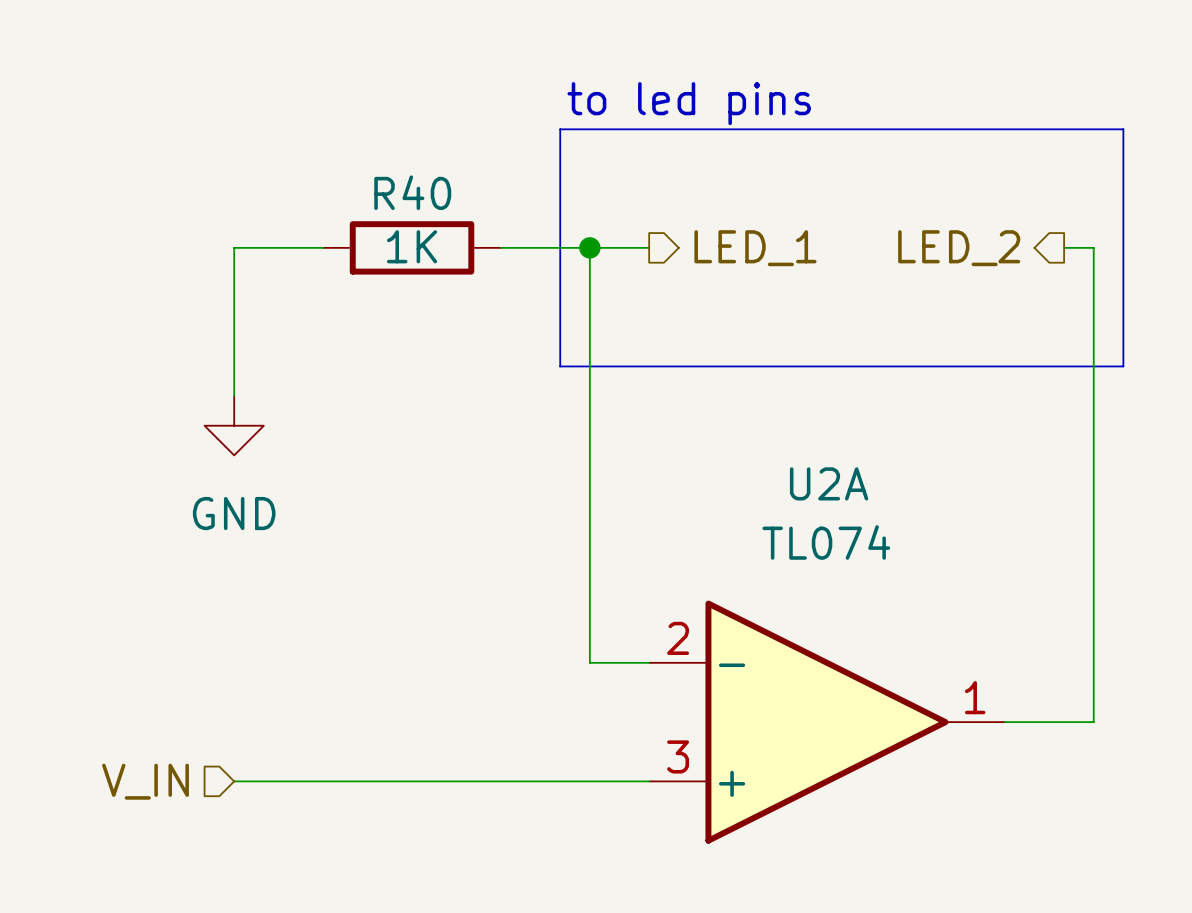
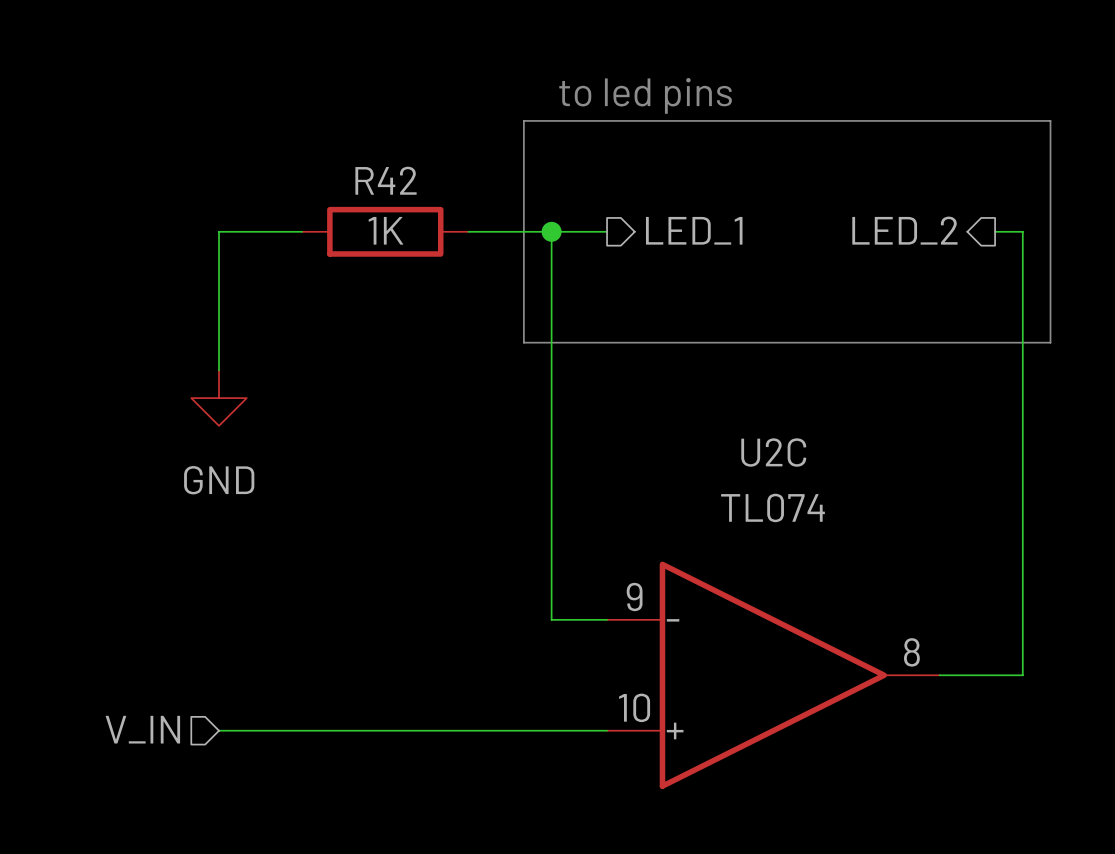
R40 name: R40 (412, 192) -> R42 (386, 180)
U2A name: U2A (829, 483) -> U2C (773, 452)
U2A pin number: 2 (678, 638) -> 9 (634, 597)
U2A pin number: 1 (975, 697) -> 8 (911, 652)
U2A pin number: 3 (678, 756) -> 10 (634, 707)

